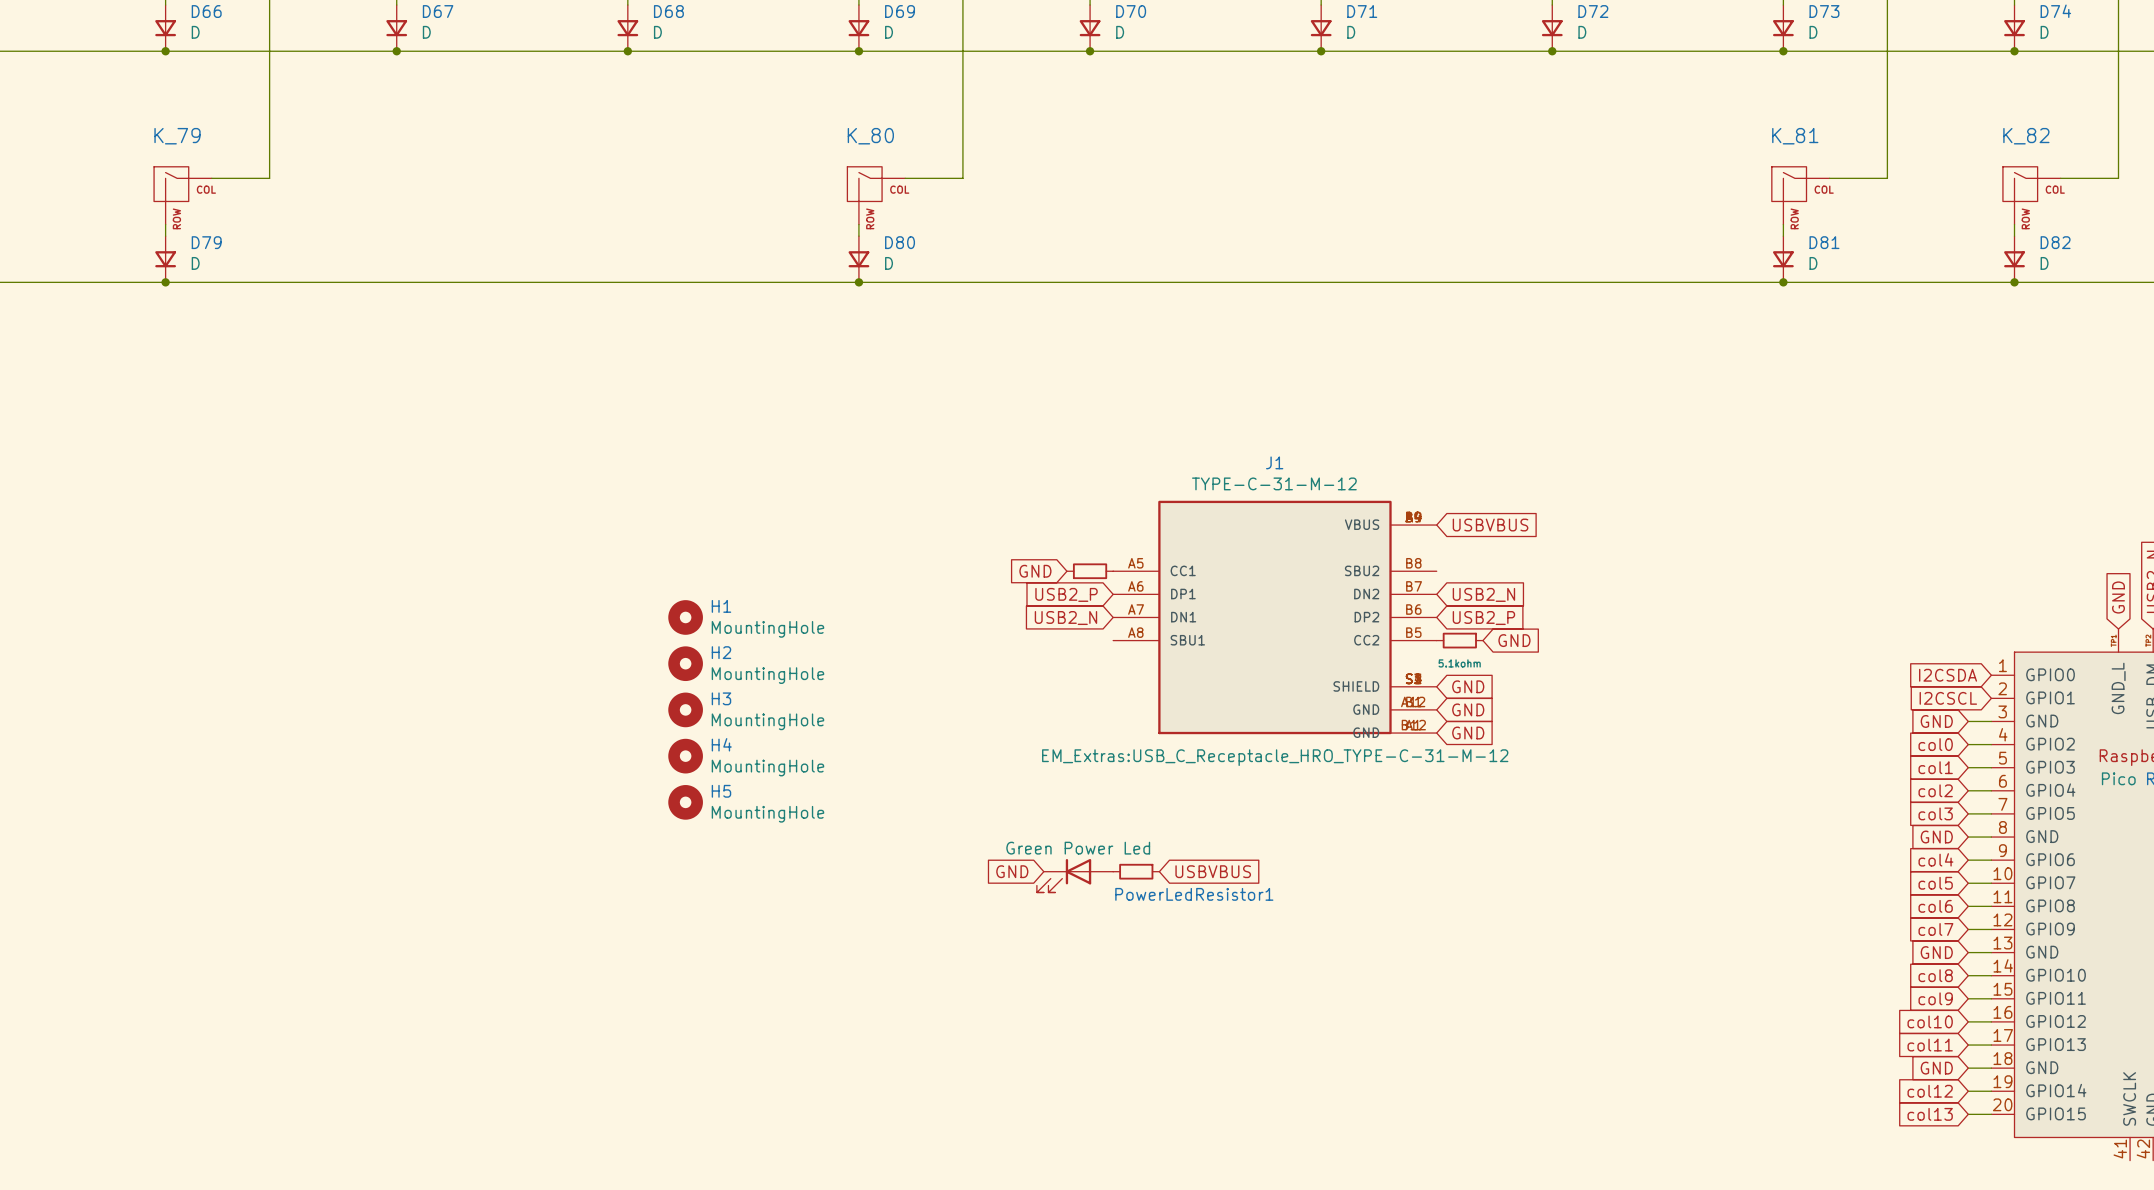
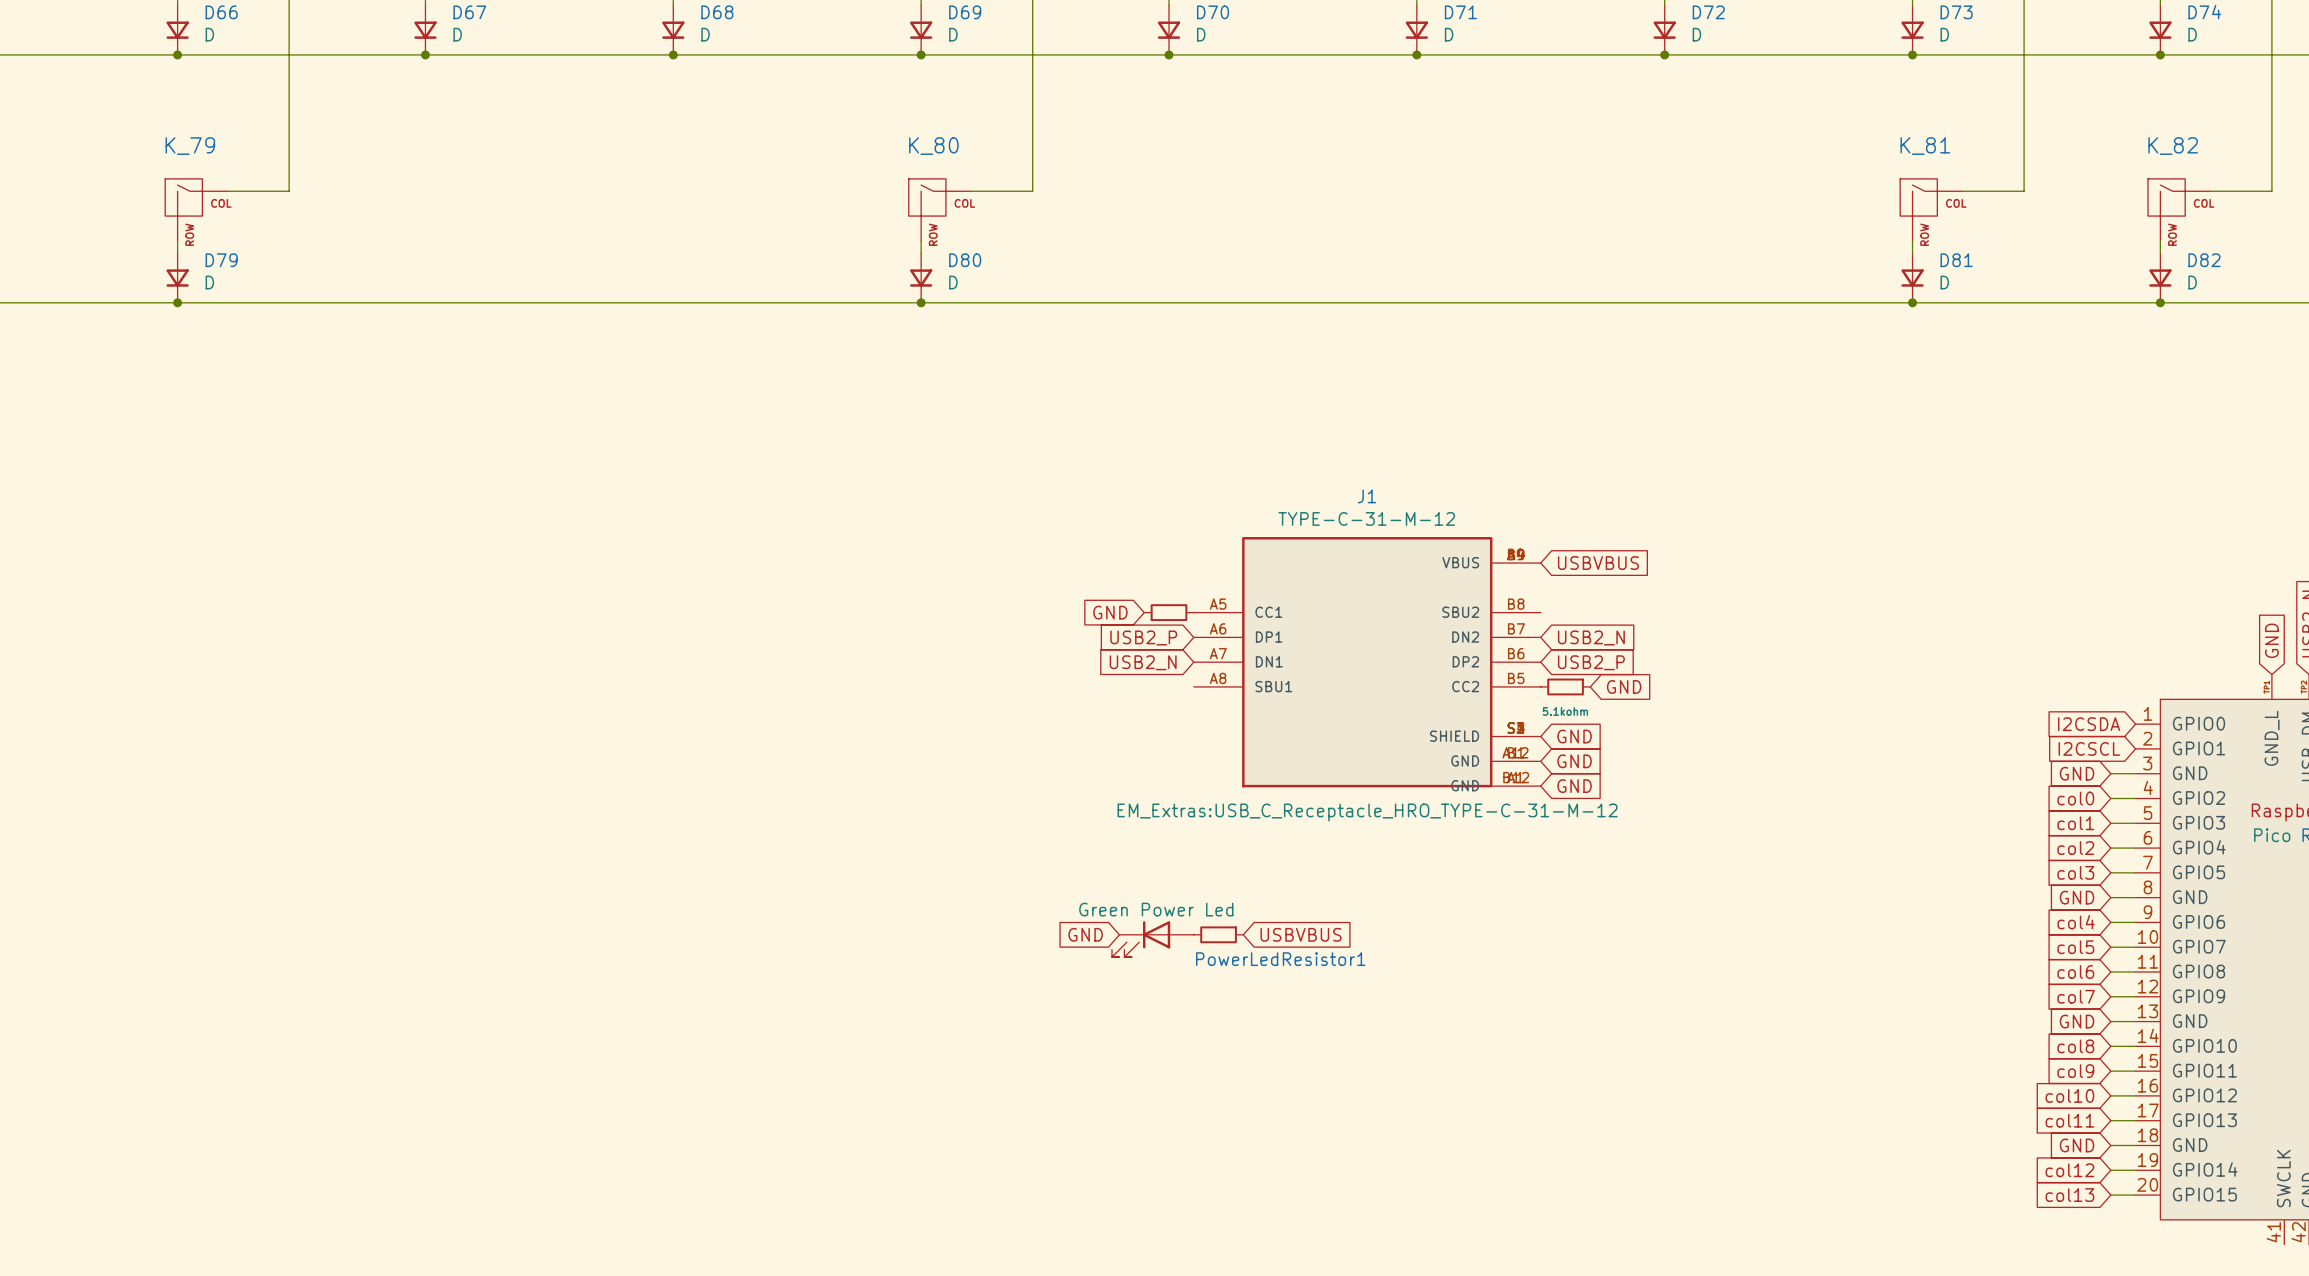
H1: MountingHole (685, 617) -> none
H2: MountingHole (685, 663) -> none
H3: MountingHole (685, 709) -> none
H4: MountingHole (685, 756) -> none
H5: MountingHole (685, 802) -> none

